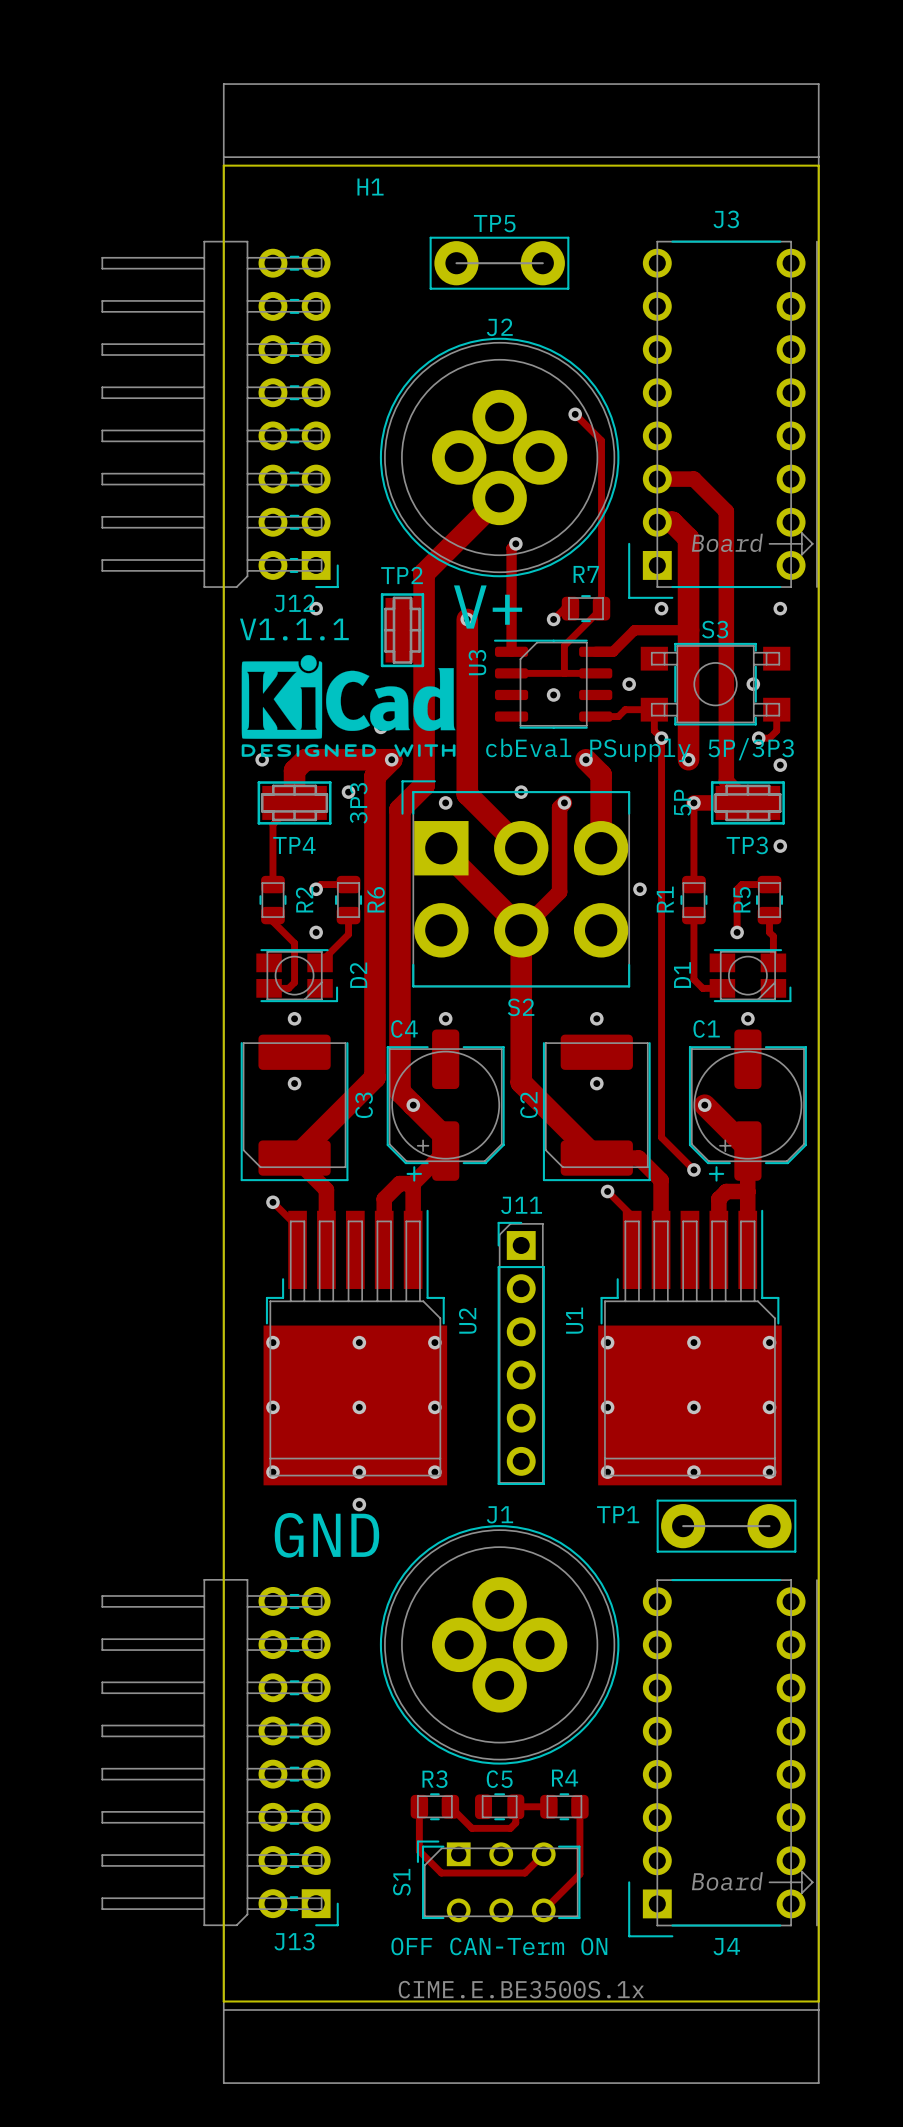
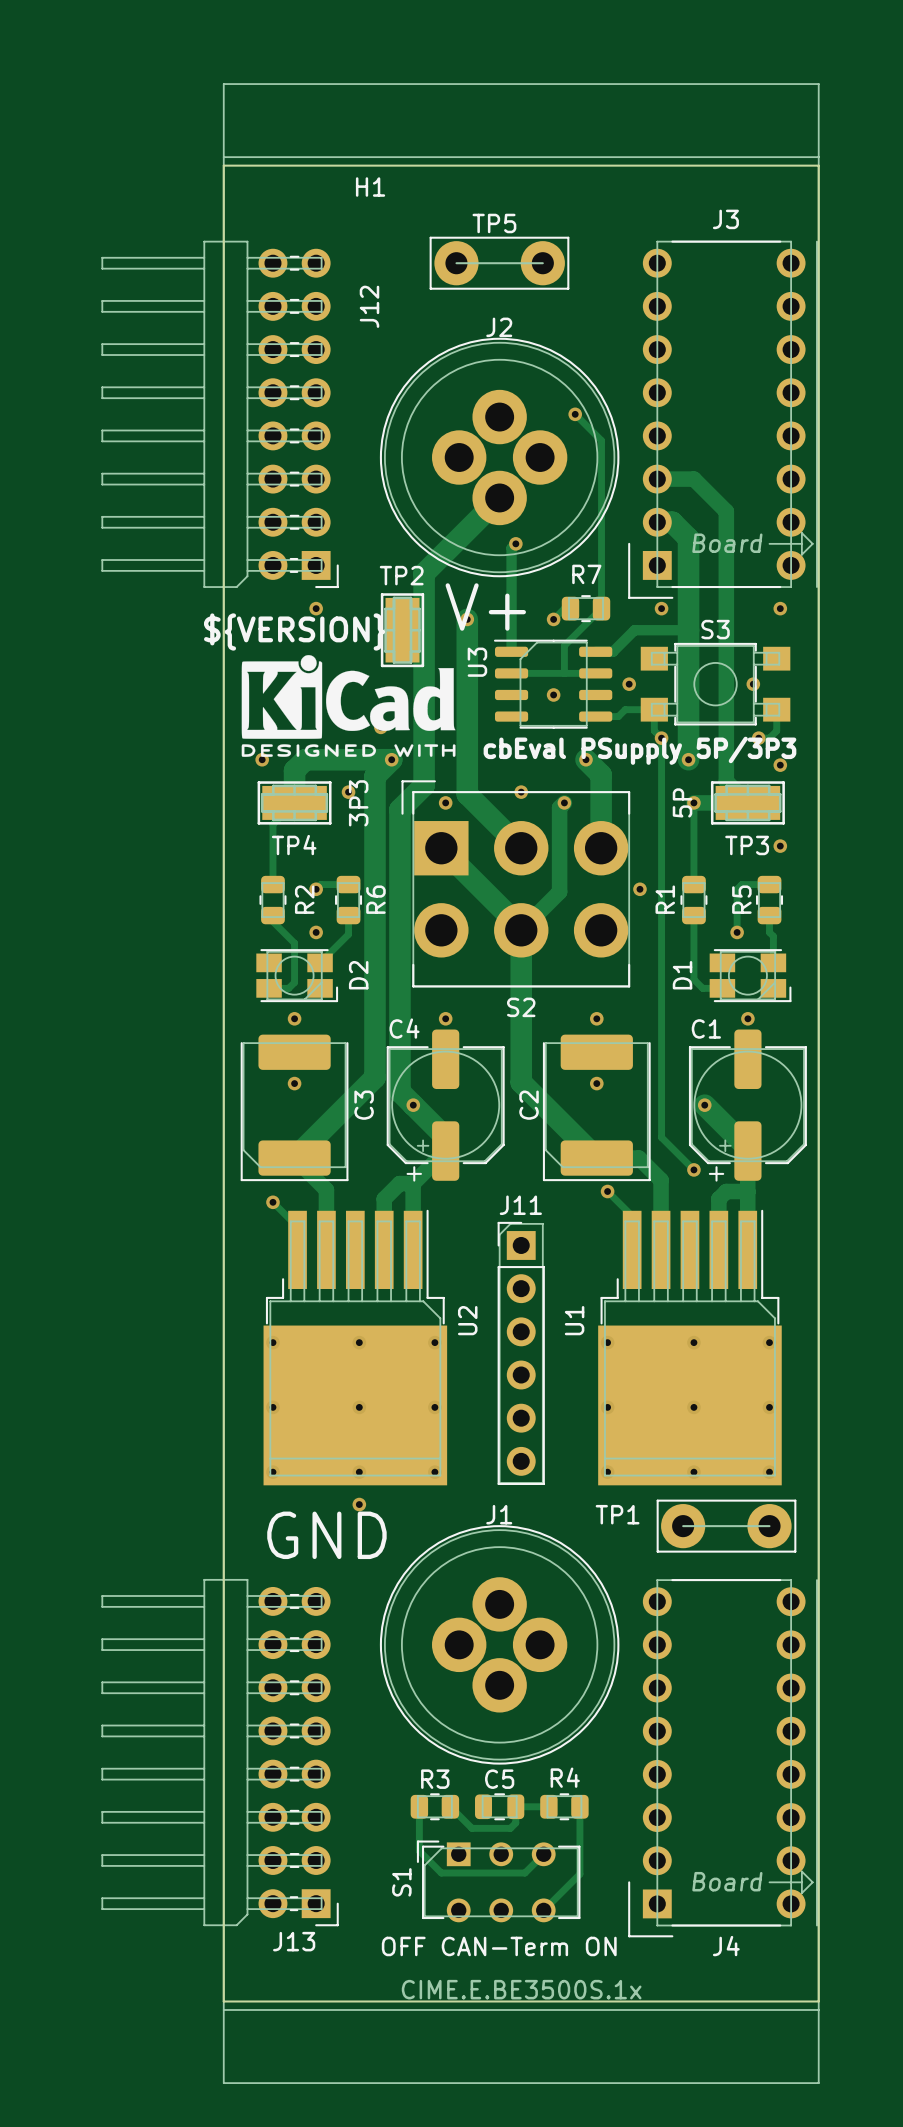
J12 name rotation: 0° (294, 603) -> 90° counterclockwise (369, 306)
J12 name position: J12 (294, 603) -> J12 (369, 306)
text: V1.1.1 (294, 629) -> ${VERSION} (294, 631)

